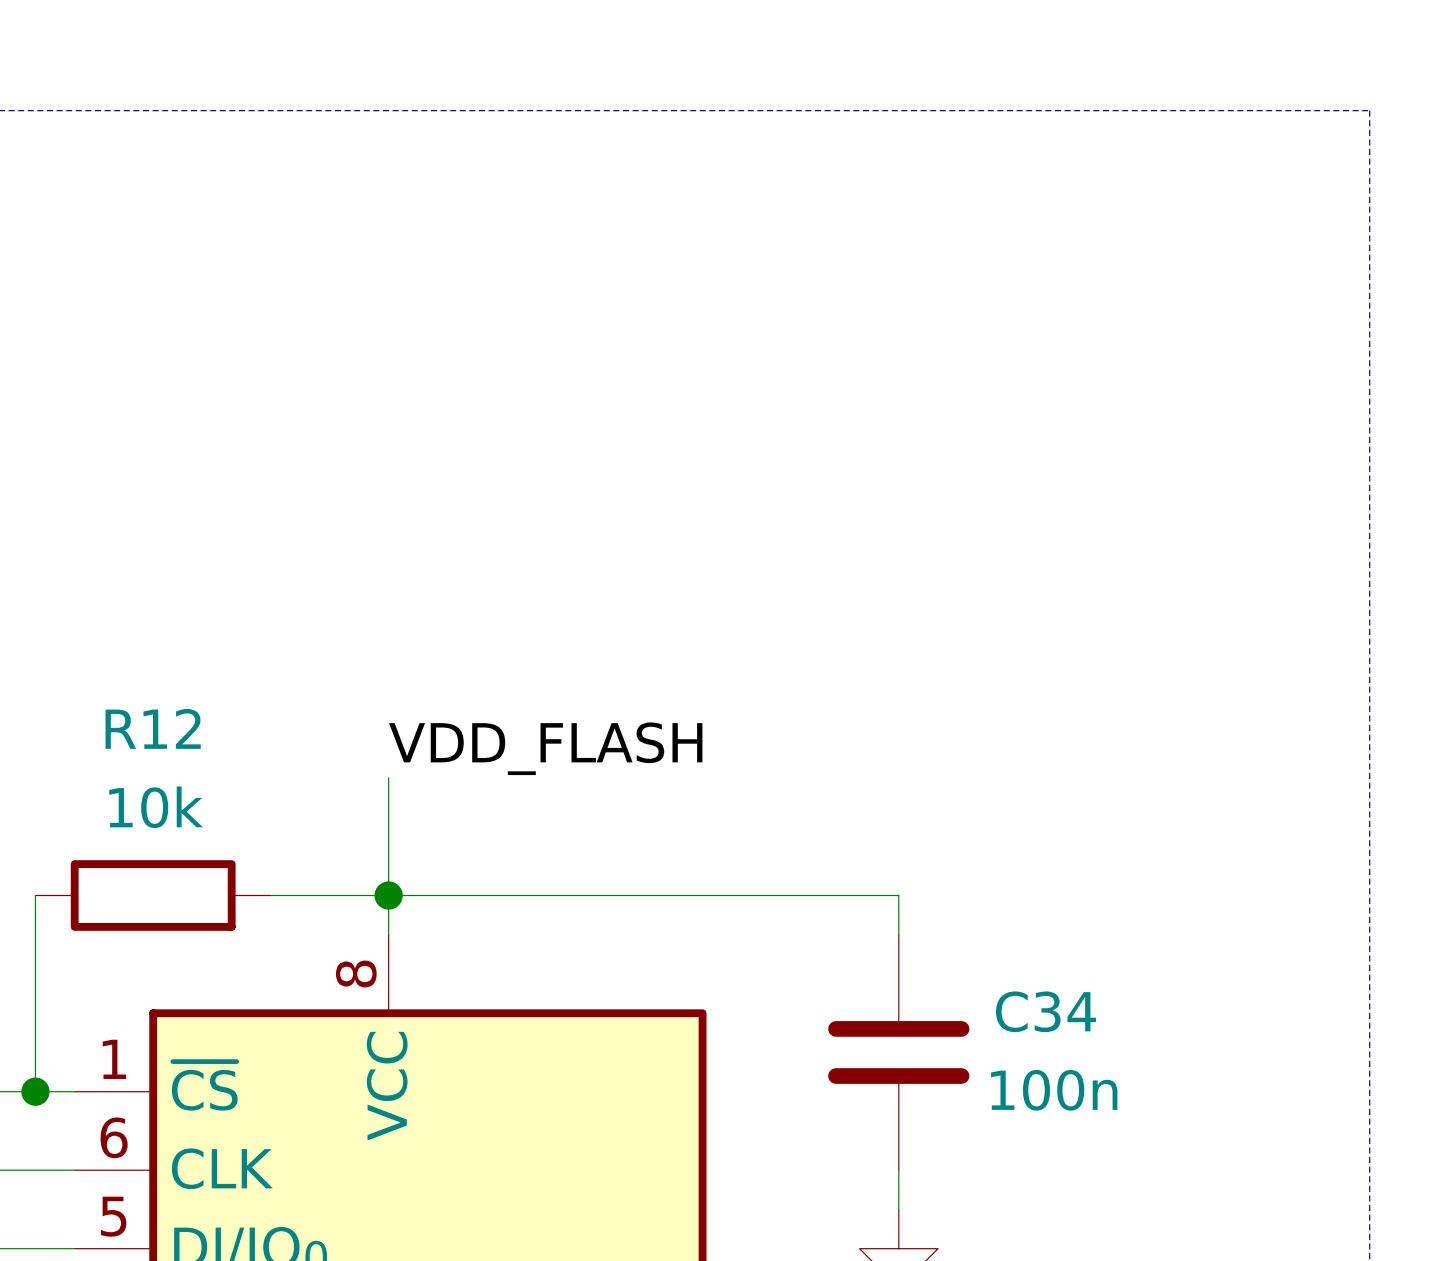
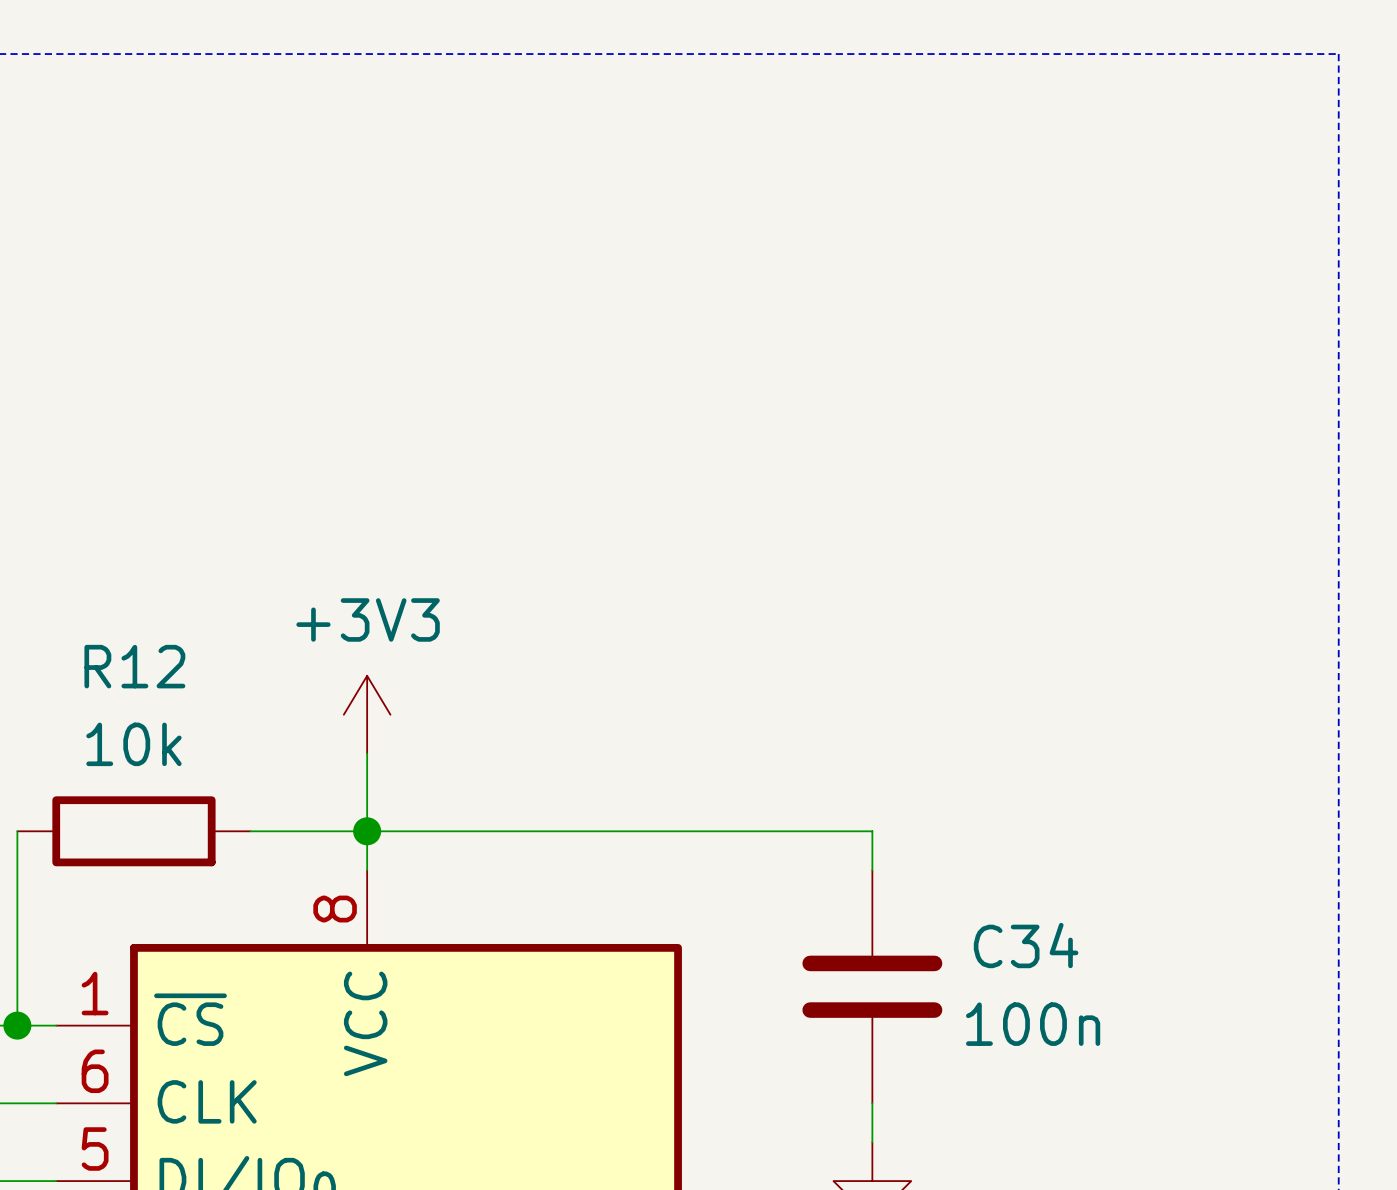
label: VDD_FLASH (545, 748) -> none
power symbol: none -> +3V3 (367, 714)

